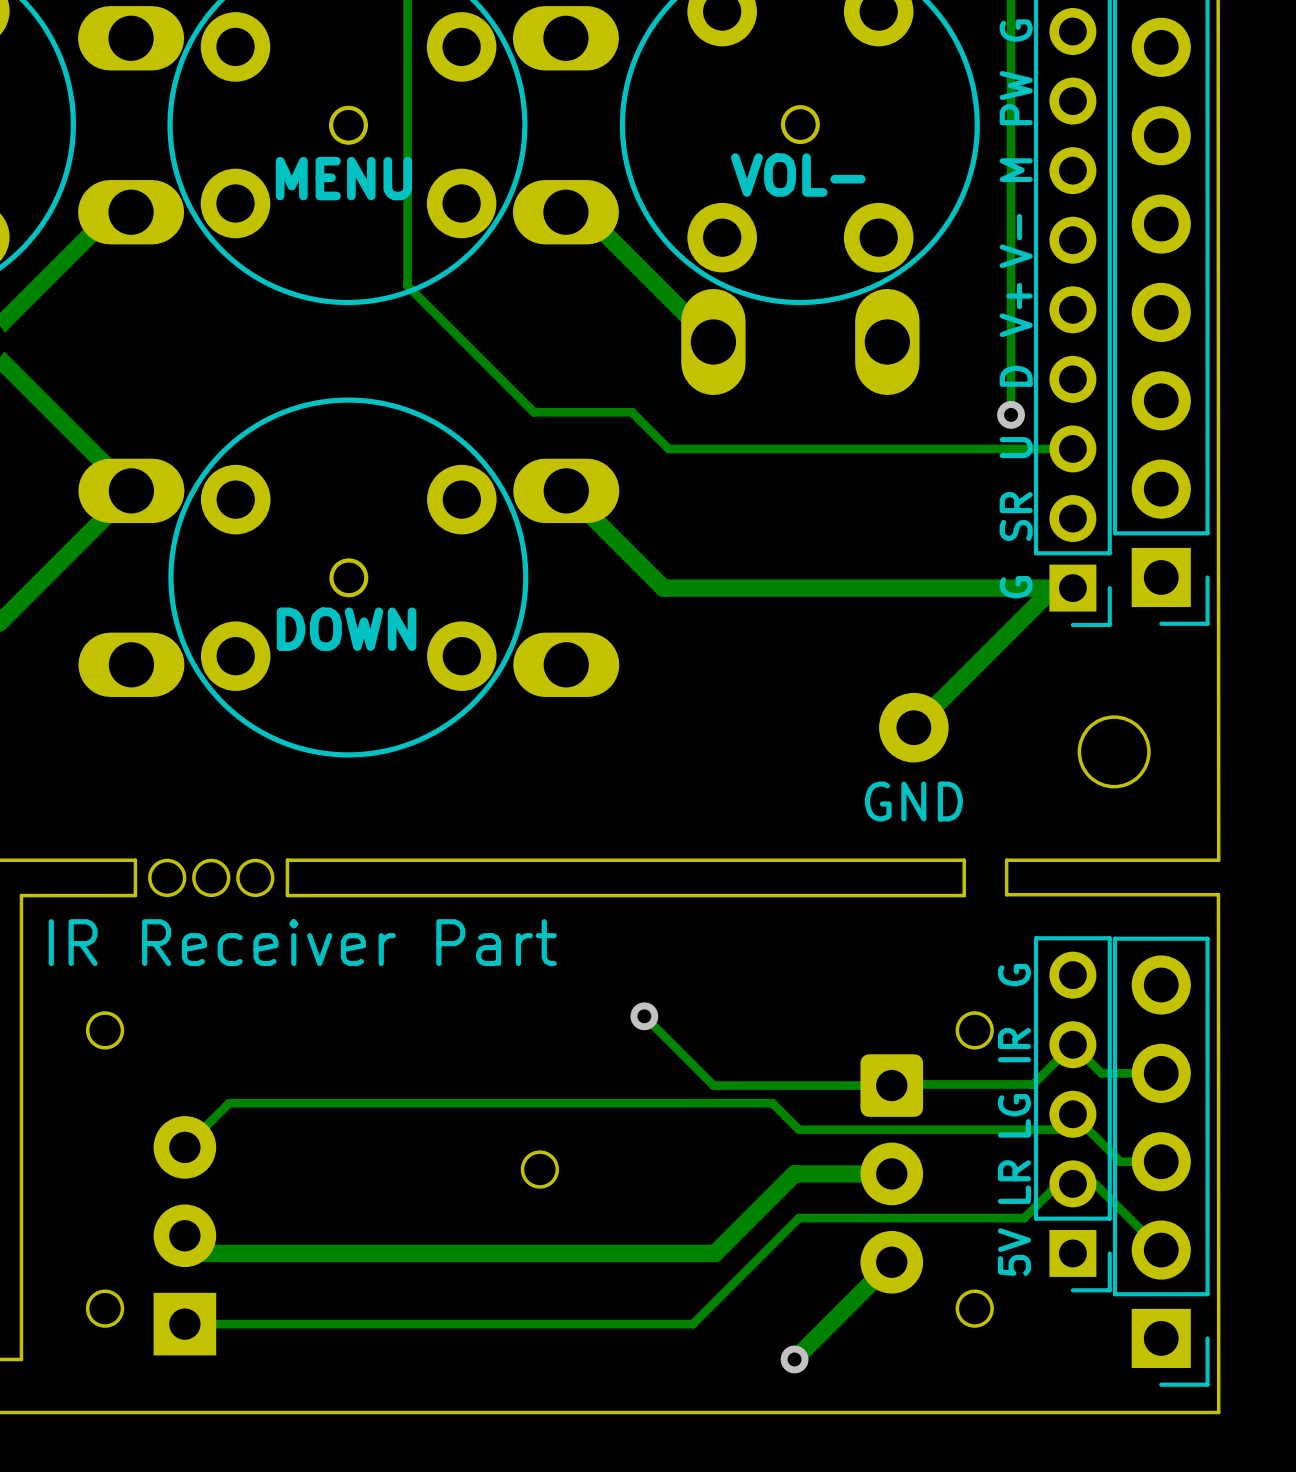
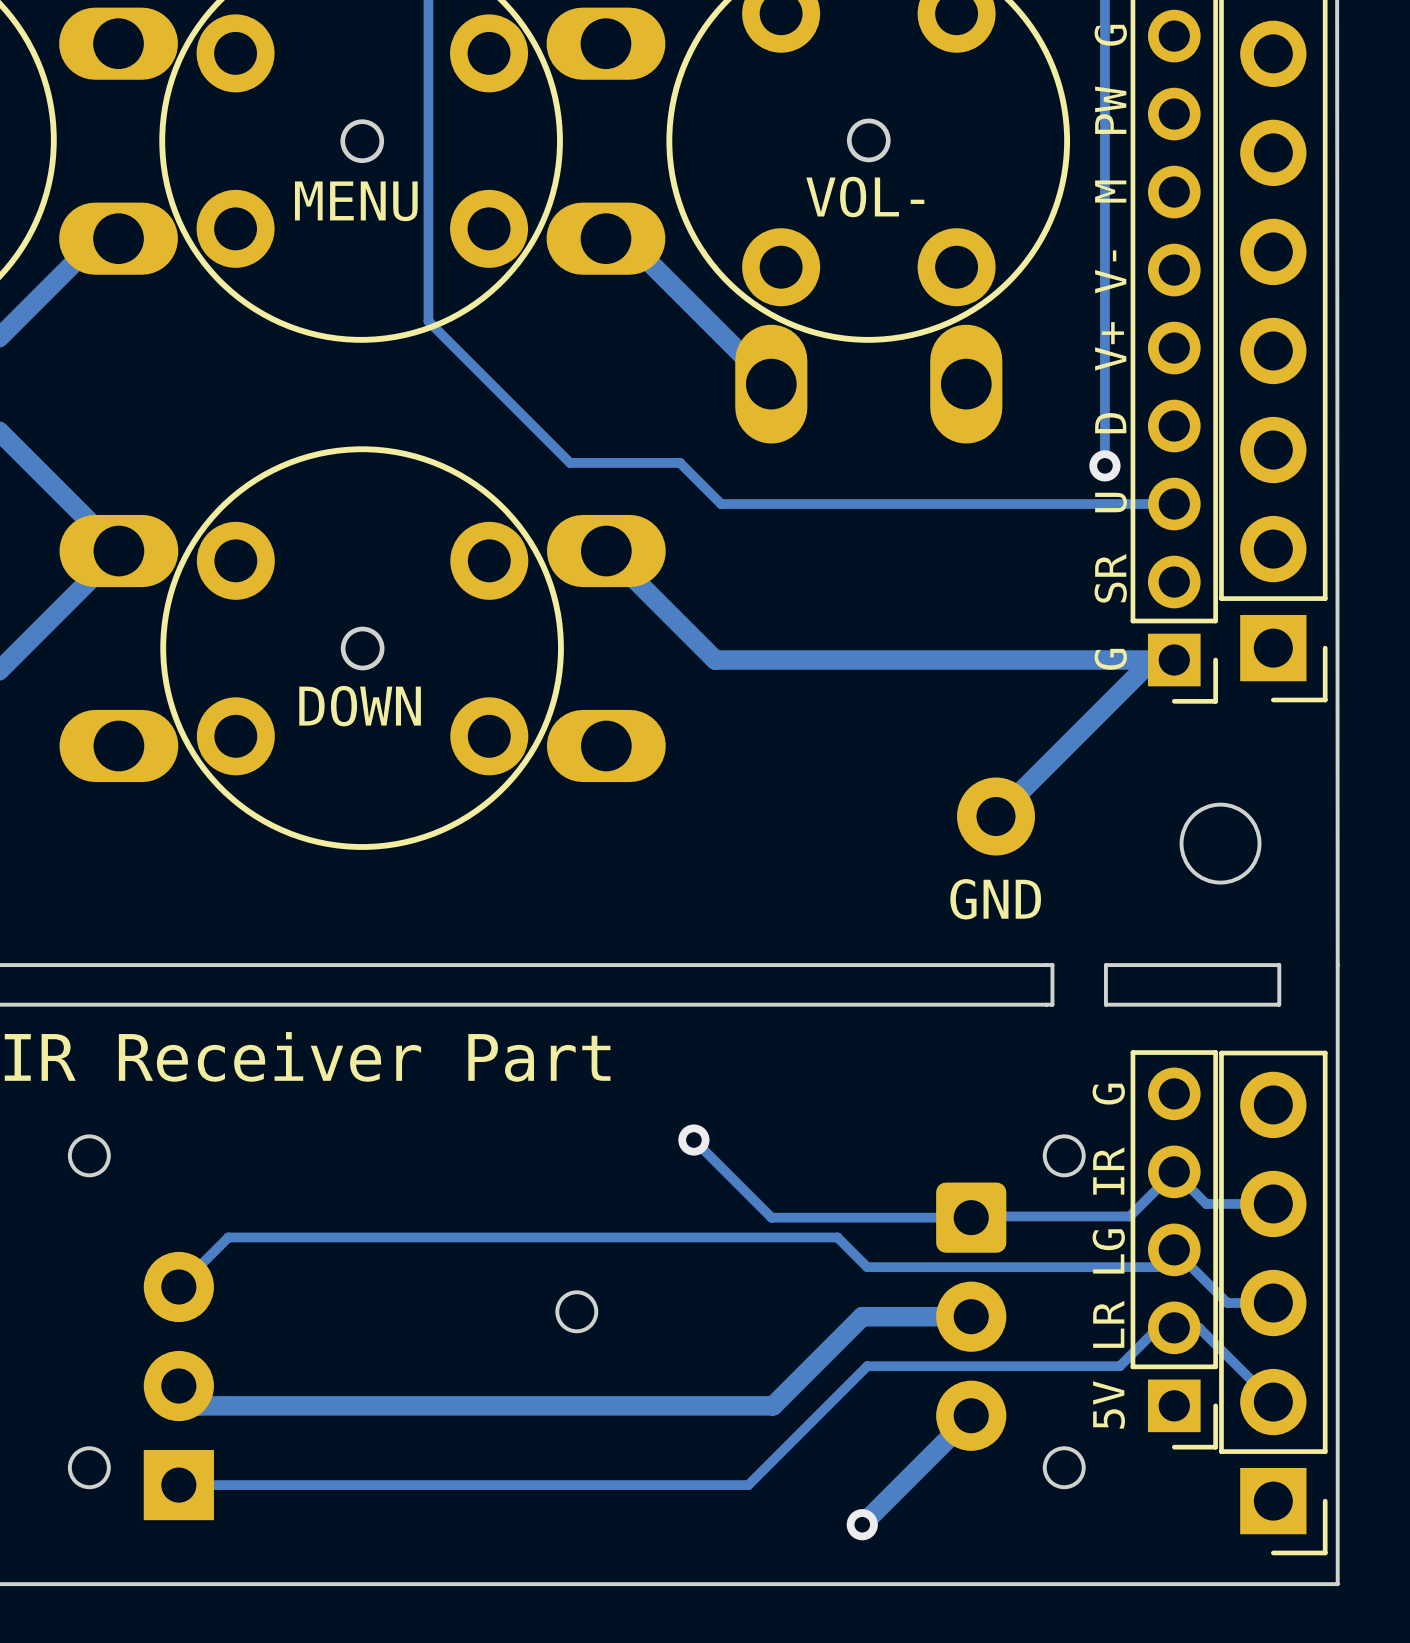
round board edge: [148, 858, 187, 898] -> none
round board edge: [192, 858, 231, 898] -> none
round board edge: [236, 858, 275, 898] -> none
board edge: (135, 860) (135, 895) -> (293, 1004) (123, 1004)
board edge: (287, 860) (287, 895) -> (293, 965) (123, 965)
board edge: (1011, 860) (1006, 860) (1006, 894) (1218, 894) (1218, 1412) -> (1337, 965) (1337, 1584)
board edge: (1218, 860) (1166, 860) -> (1105, 965) (1105, 1004) (1279, 1004) (1279, 965)

